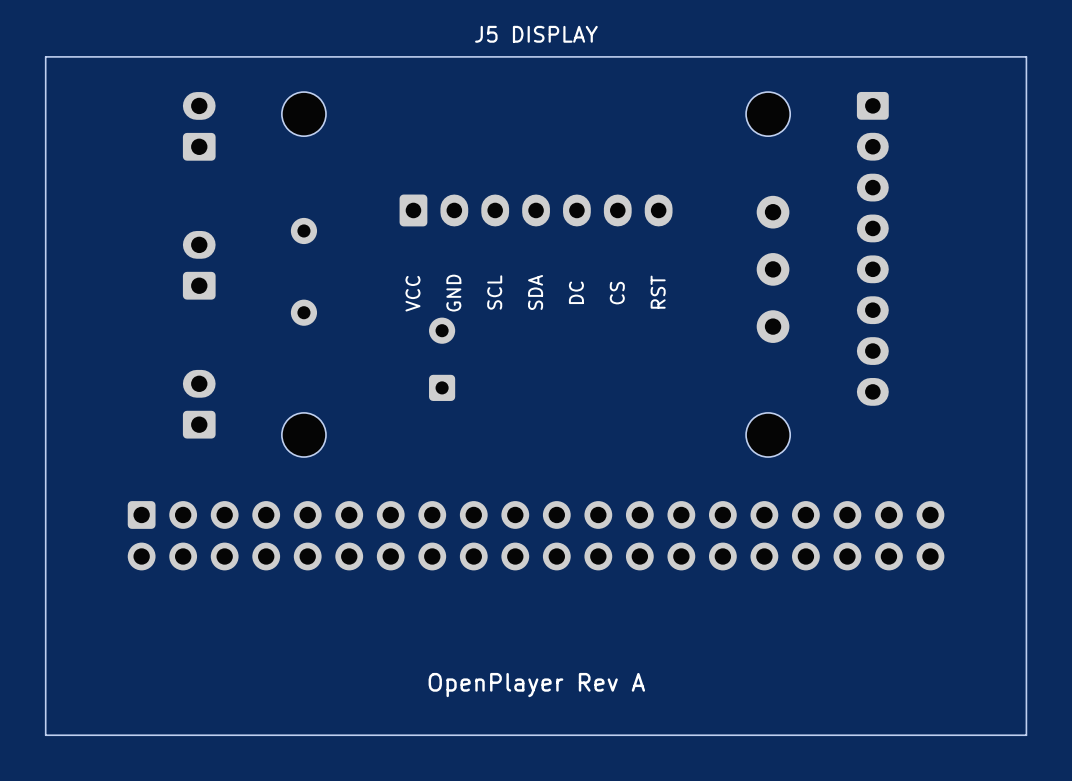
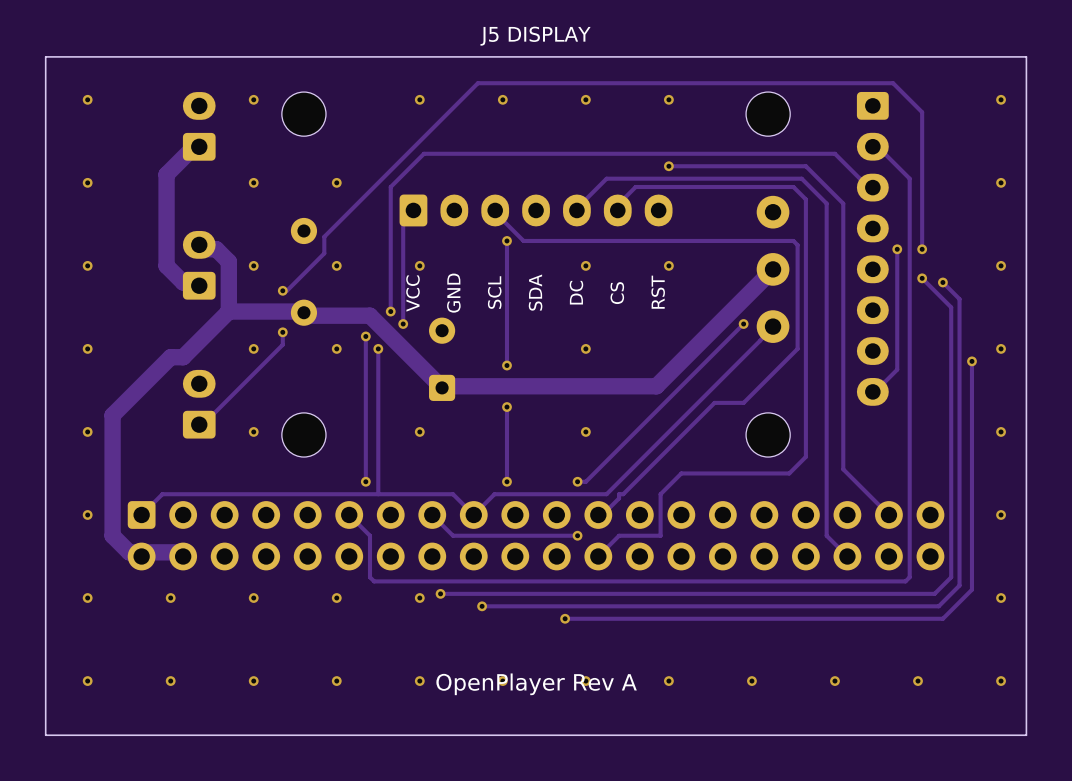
via: none -> (87, 99)
via: none -> (253, 99)
via: none -> (419, 99)
via: none -> (502, 99)
via: none -> (585, 99)
via: none -> (668, 99)
via: none -> (1001, 99)
track: none -> (199, 146) (191, 149) (166, 174) (166, 265) (183, 282) (191, 282) (199, 285)
track: none -> (872, 146) (884, 153) (909, 178) (909, 577) (905, 581) (374, 581) (369, 577) (369, 535) (349, 514)
track: none -> (668, 166) (805, 166) (843, 203) (843, 469) (888, 514)
via: none -> (668, 166)
via: none -> (87, 182)
via: none -> (253, 182)
via: none -> (336, 182)
via: none -> (1001, 182)
track: none -> (872, 187) (859, 178) (834, 153) (423, 153) (390, 187) (390, 311)
track: none -> (413, 210) (403, 220) (403, 324)
track: none -> (495, 210) (523, 240) (793, 240) (797, 245) (797, 348) (743, 402) (714, 402) (623, 494) (619, 494) (619, 498) (606, 510) (598, 514)
track: none -> (576, 210) (606, 178) (801, 178) (826, 203) (826, 535) (847, 556)
track: none -> (617, 210) (623, 199) (635, 187) (793, 187) (805, 199) (805, 456) (789, 473) (681, 473) (660, 494) (660, 535) (619, 535) (598, 556)
track: none -> (506, 240) (506, 365)
via: none -> (506, 240)
track: none -> (199, 244) (203, 249) (216, 249) (228, 261) (228, 311)
track: none -> (897, 249) (897, 369) (872, 391)
via: none -> (897, 249)
track: none -> (922, 249) (922, 112) (893, 83) (477, 83) (324, 236) (324, 253) (286, 290) (282, 290)
via: none -> (922, 249)
via: none -> (87, 265)
via: none -> (253, 265)
via: none -> (336, 265)
via: none -> (419, 265)
via: none -> (585, 265)
via: none -> (668, 265)
via: none -> (1001, 265)
track: none -> (773, 269) (656, 386) (444, 386) (442, 387) (369, 315) (307, 315) (299, 311) (228, 311)
track: none -> (922, 278) (951, 307) (951, 577) (934, 593) (440, 593)
via: none -> (922, 278)
track: none -> (942, 282) (959, 299) (959, 585) (938, 606) (482, 606)
via: none -> (942, 282)
via: none -> (282, 290)
track: none -> (228, 311) (183, 357) (170, 357) (112, 415) (112, 535) (129, 552) (137, 552) (141, 556) (145, 552) (179, 552) (183, 556)
via: none -> (390, 311)
via: none -> (403, 324)
track: none -> (743, 324) (585, 481) (577, 481)
via: none -> (743, 324)
track: none -> (773, 326) (606, 494) (494, 494) (473, 514) (453, 494) (162, 494) (141, 514)
track: none -> (282, 332) (282, 344) (212, 415) (199, 424)
via: none -> (282, 332)
track: none -> (365, 336) (365, 481)
via: none -> (365, 336)
via: none -> (87, 348)
via: none -> (253, 348)
via: none -> (336, 348)
track: none -> (378, 348) (378, 494)
via: none -> (378, 348)
via: none -> (585, 348)
via: none -> (1001, 348)
track: none -> (971, 361) (971, 589) (942, 618) (565, 618)
via: none -> (971, 361)
via: none -> (506, 365)
track: none -> (506, 407) (506, 481)
via: none -> (506, 407)
via: none -> (87, 431)
via: none -> (253, 431)
via: none -> (419, 431)
via: none -> (585, 431)
via: none -> (1001, 431)
via: none -> (365, 481)
via: none -> (506, 481)
via: none -> (577, 481)
via: none -> (87, 514)
track: none -> (432, 514) (453, 535) (577, 535)
via: none -> (1001, 514)
via: none -> (577, 535)
via: none -> (440, 593)
via: none -> (87, 598)
via: none -> (170, 598)
via: none -> (253, 598)
via: none -> (336, 598)
via: none -> (419, 598)
via: none -> (1001, 598)
via: none -> (482, 606)
via: none -> (565, 618)
via: none -> (87, 681)
via: none -> (170, 681)
via: none -> (253, 681)
via: none -> (336, 681)
via: none -> (419, 681)
via: none -> (502, 681)
via: none -> (585, 681)
via: none -> (668, 681)
via: none -> (751, 681)
via: none -> (834, 681)
via: none -> (918, 681)
via: none -> (1001, 681)

